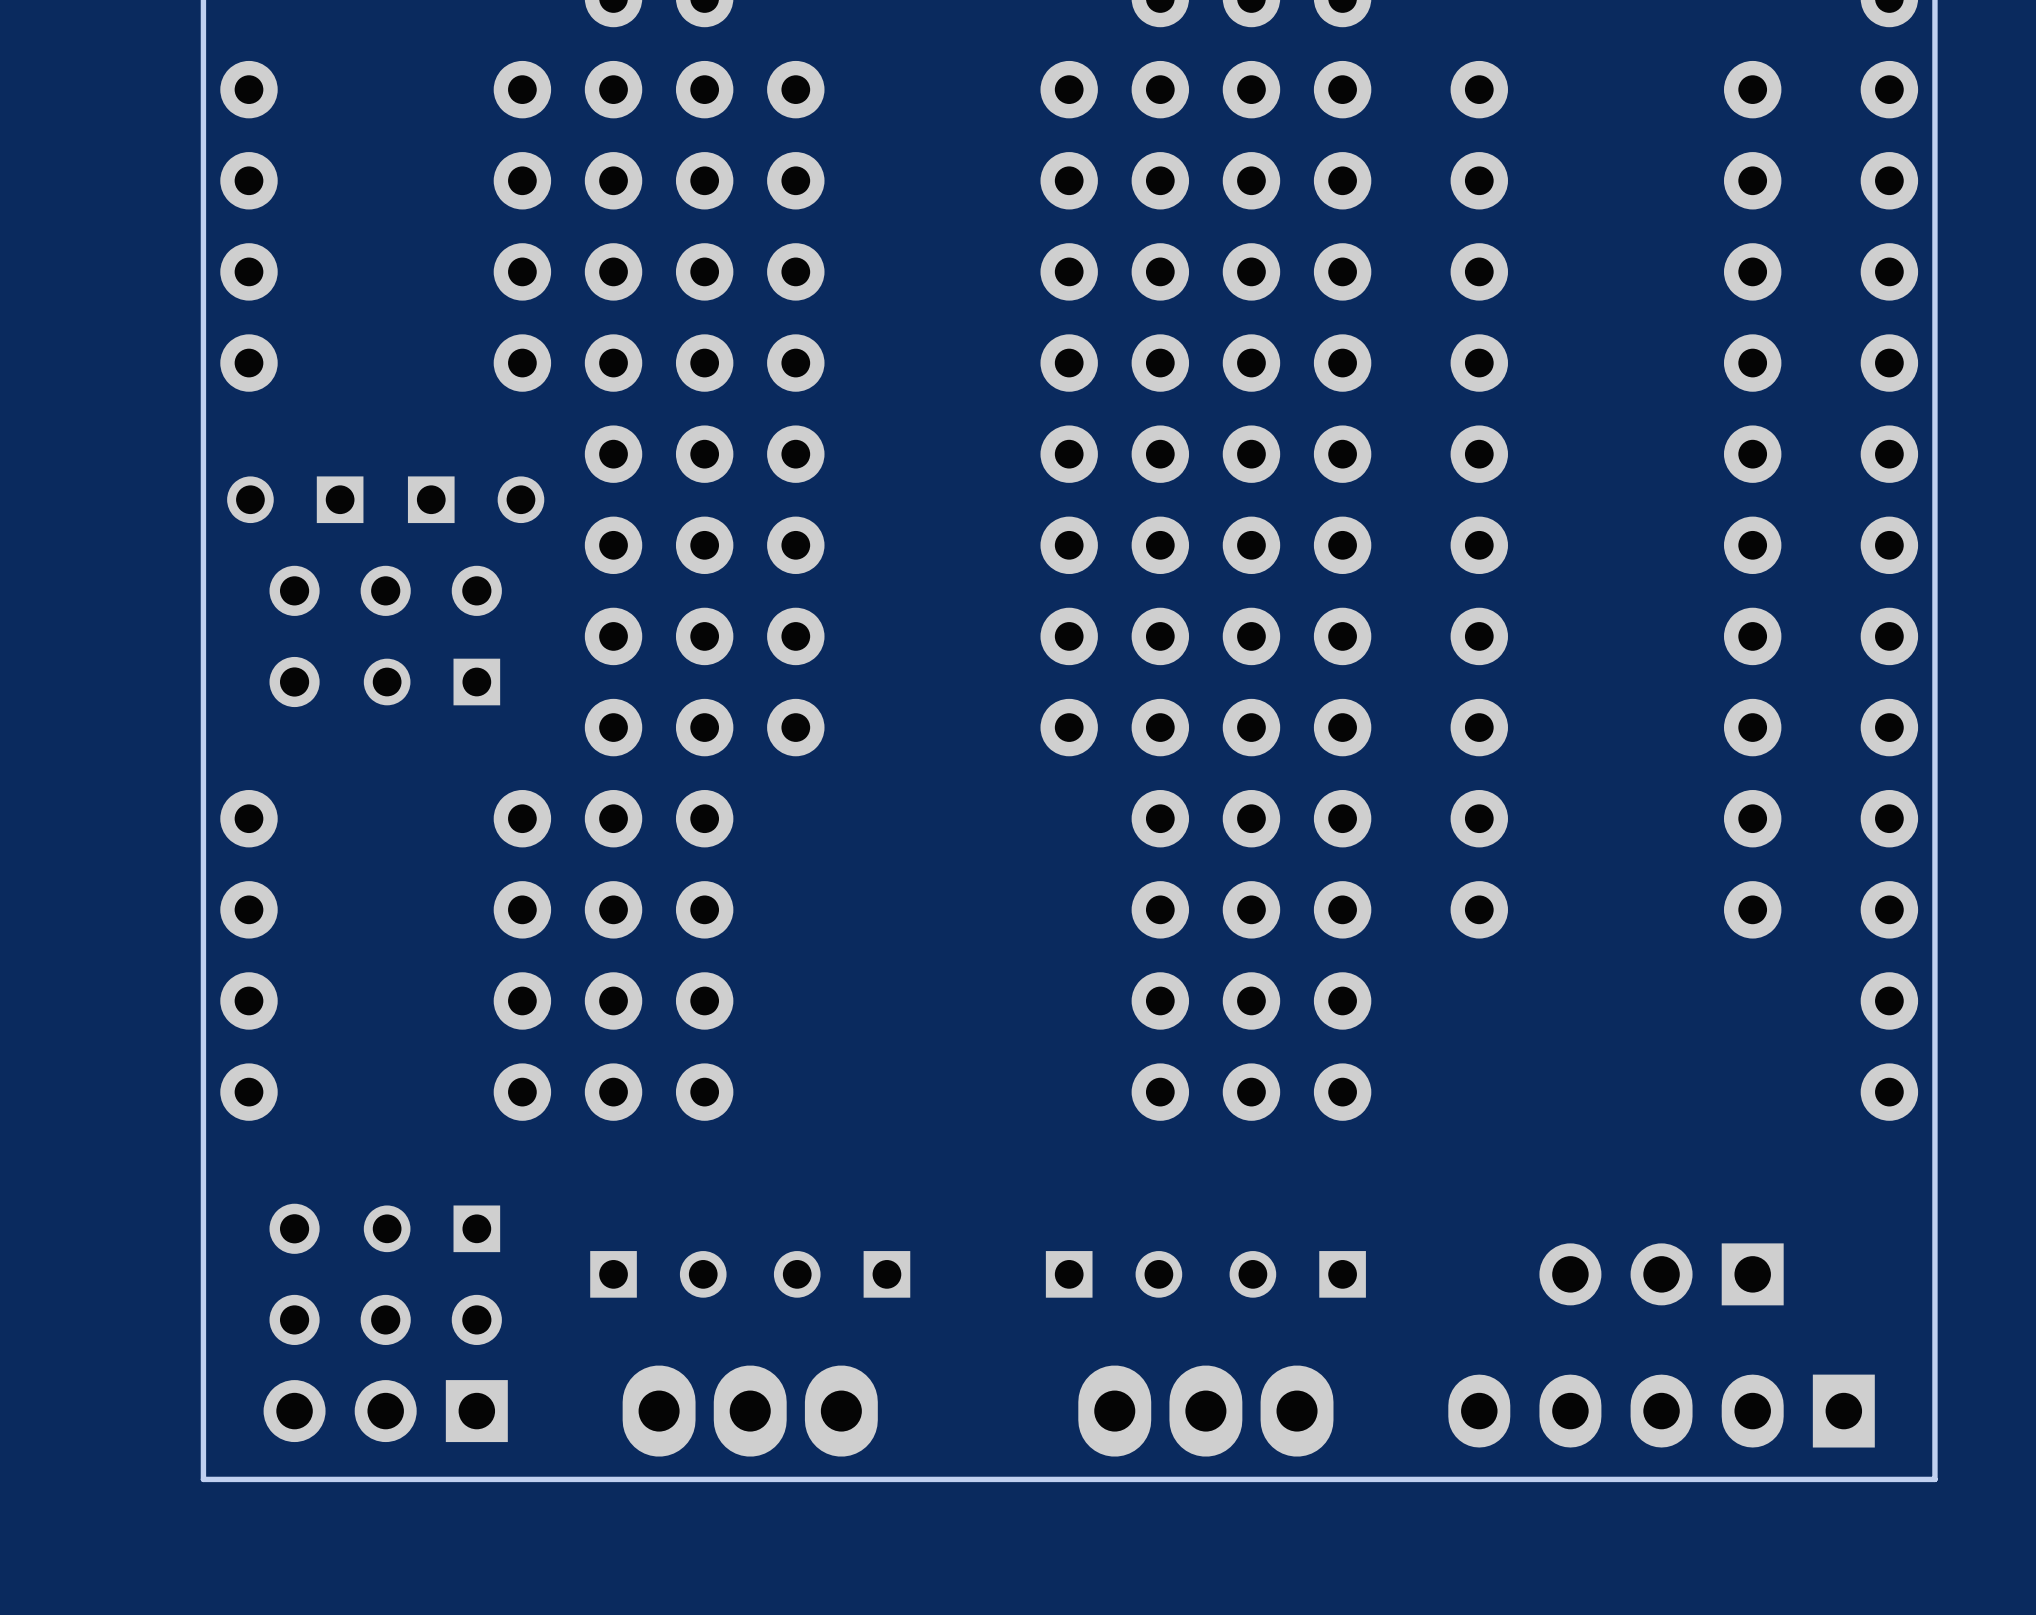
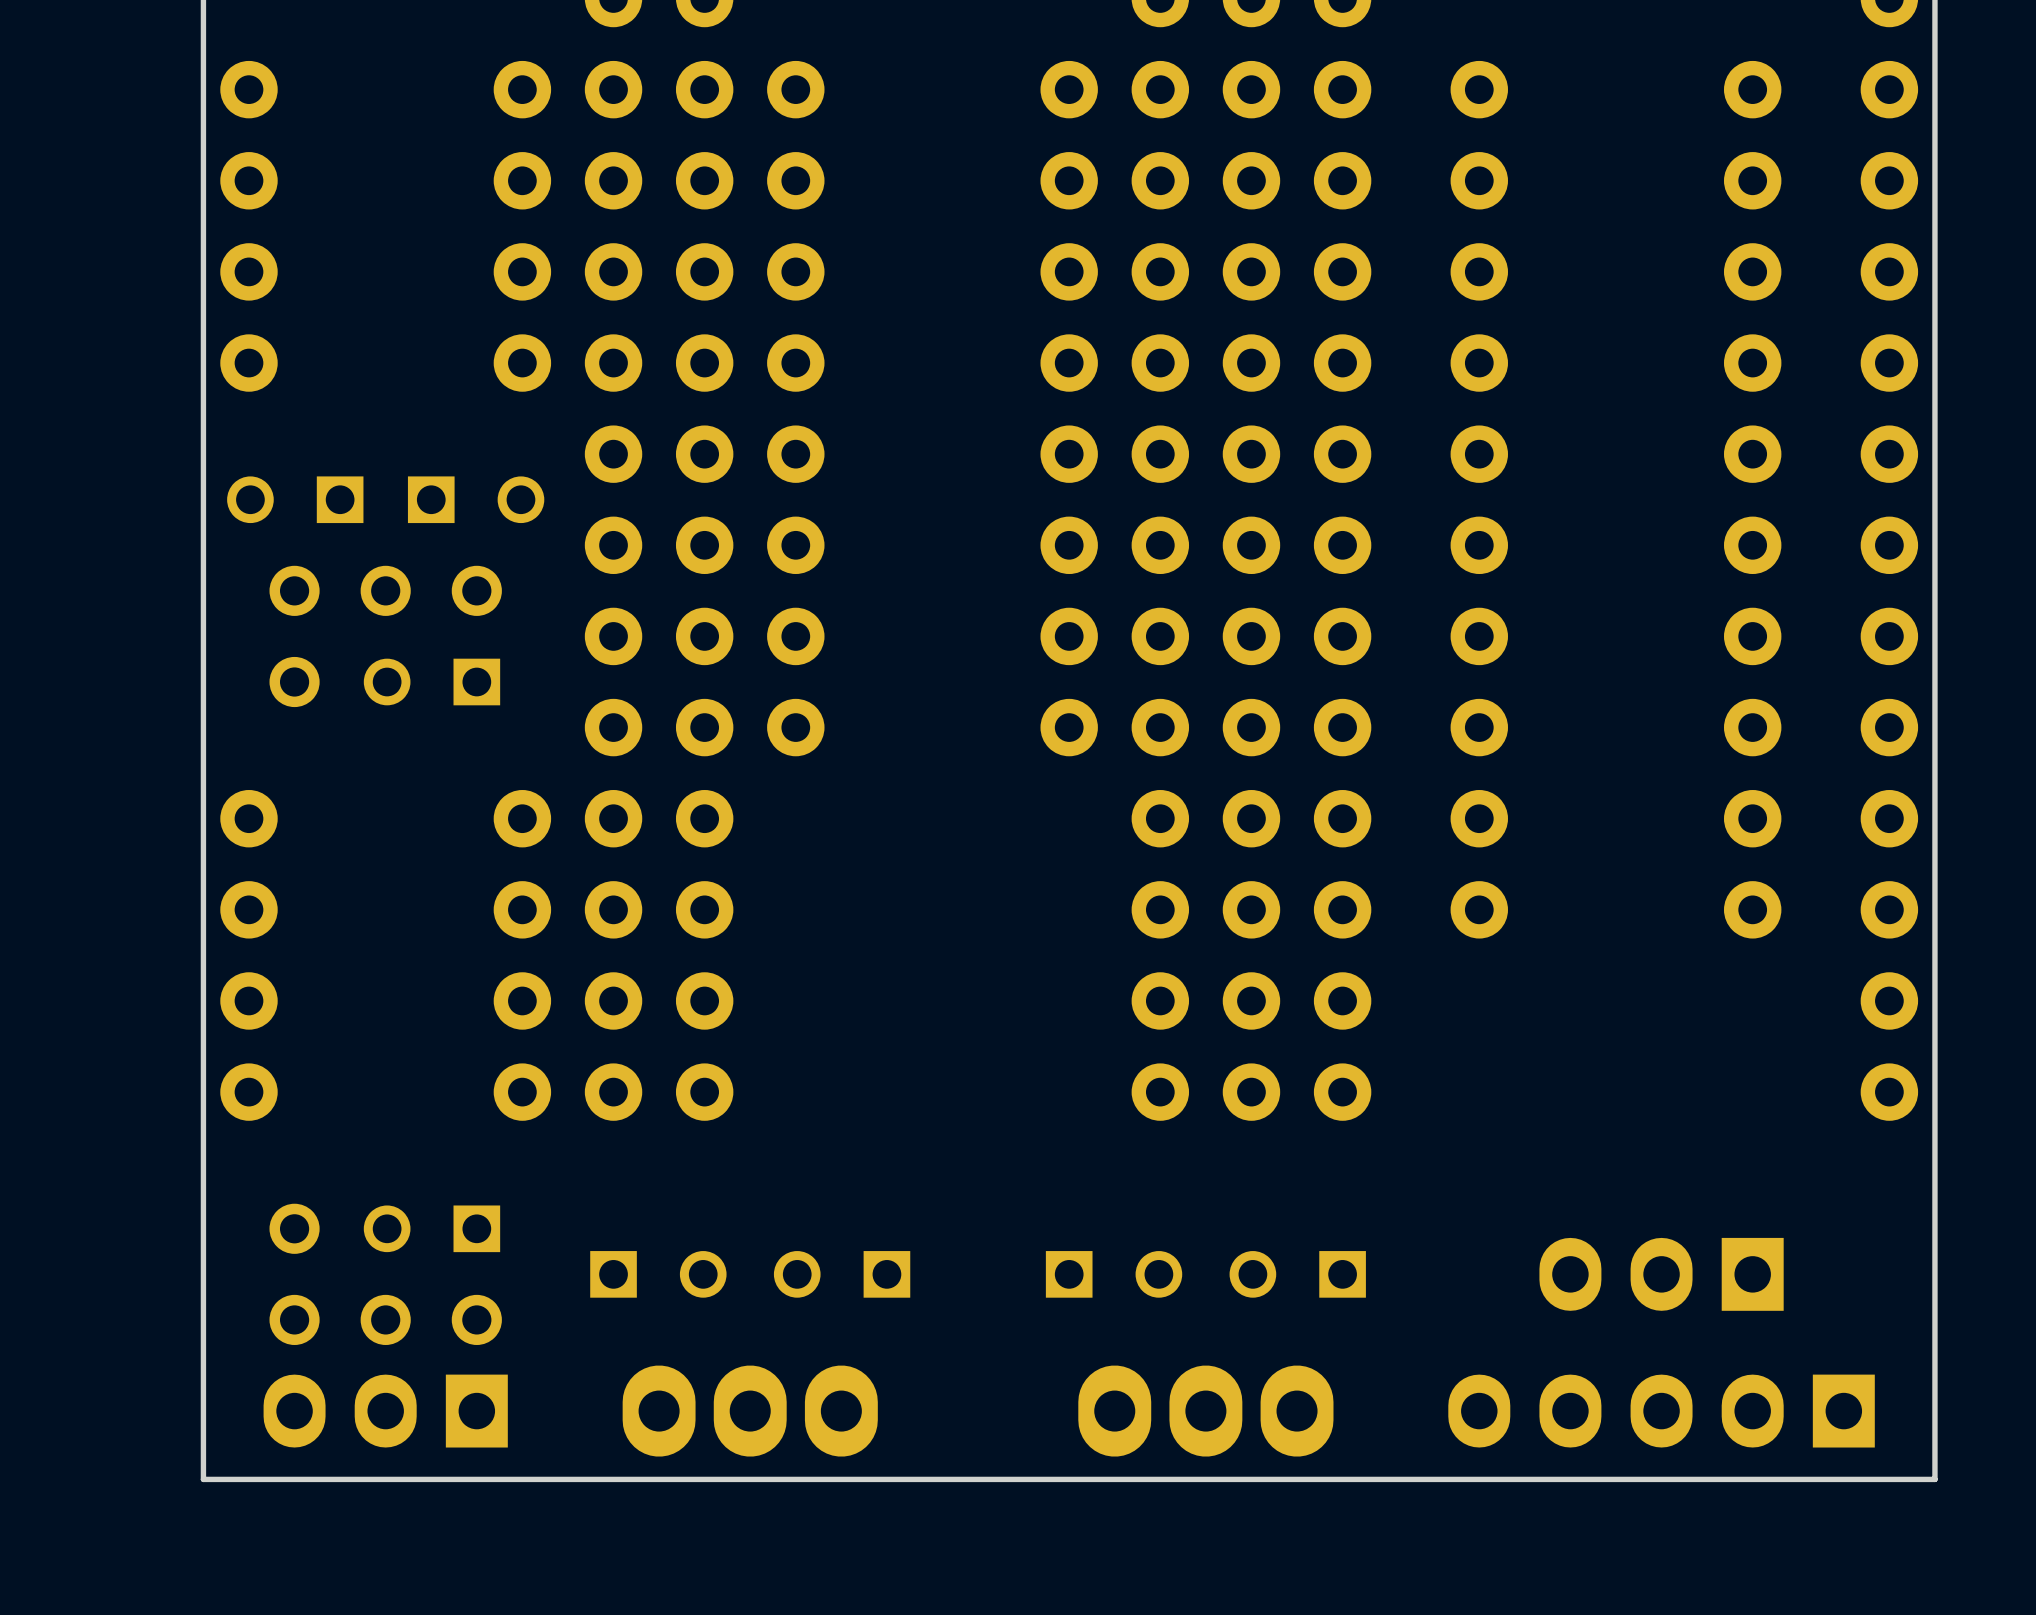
part footprint: [1539, 1243, 1784, 1306] -> [1539, 1237, 1784, 1311]
part footprint: [263, 1380, 508, 1443] -> [263, 1374, 508, 1448]

